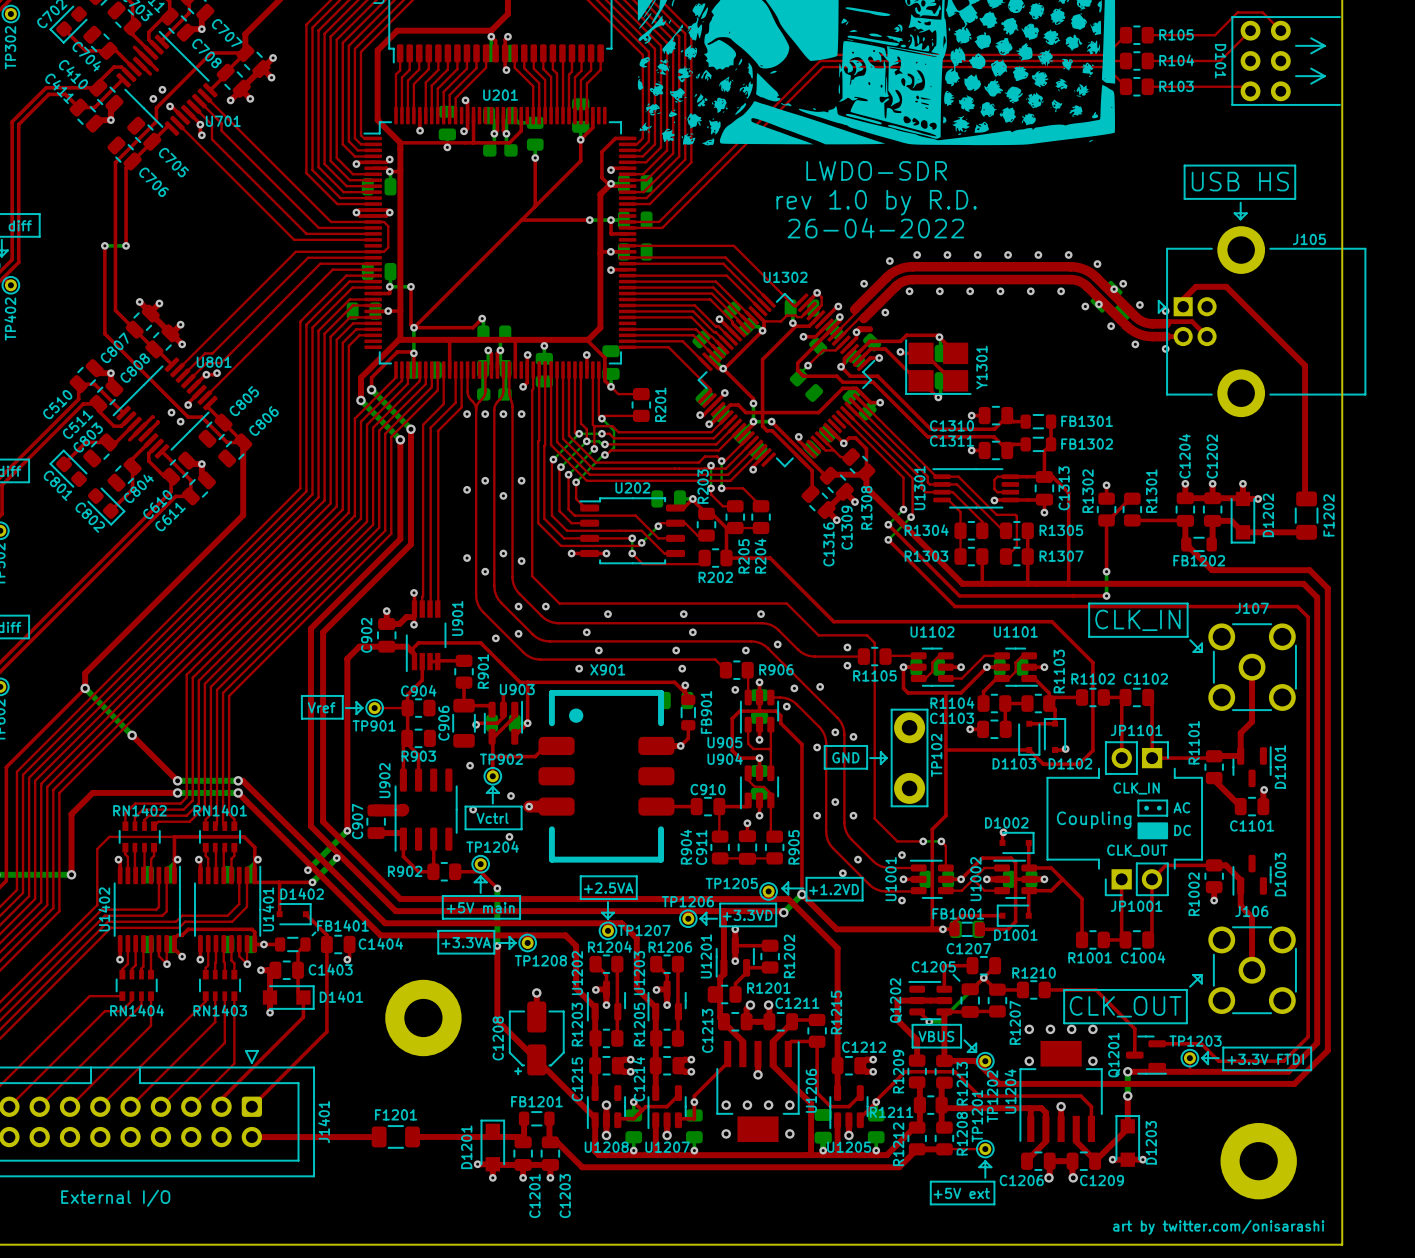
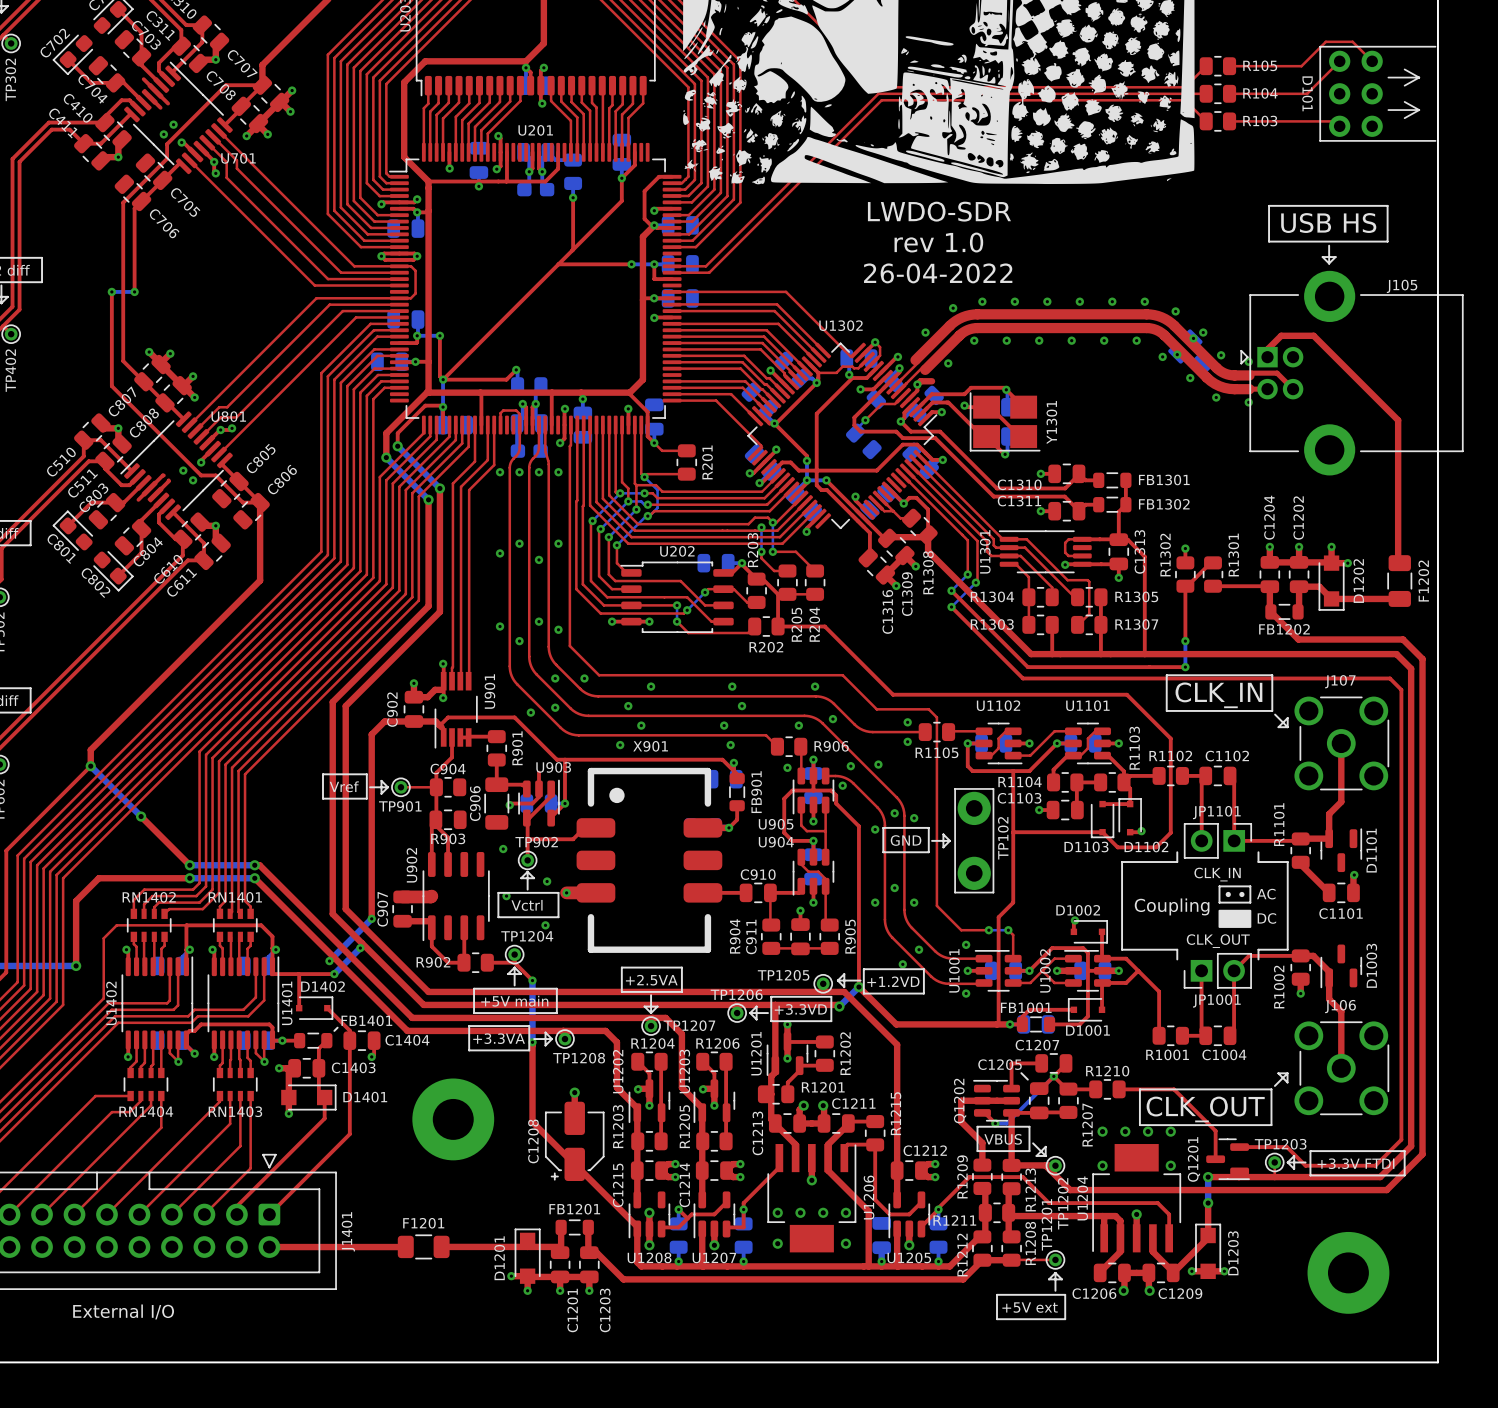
text: rev 1.0 by R.D. (876, 202) -> rev 1.0 (938, 242)
top track: (467, 370) (467, 393) (476, 409) -> (500, 425) (500, 413) (503, 410) (516, 410) (519, 414) (519, 425)
text: art by twitter.com/onisarashi (1218, 1227) -> none

